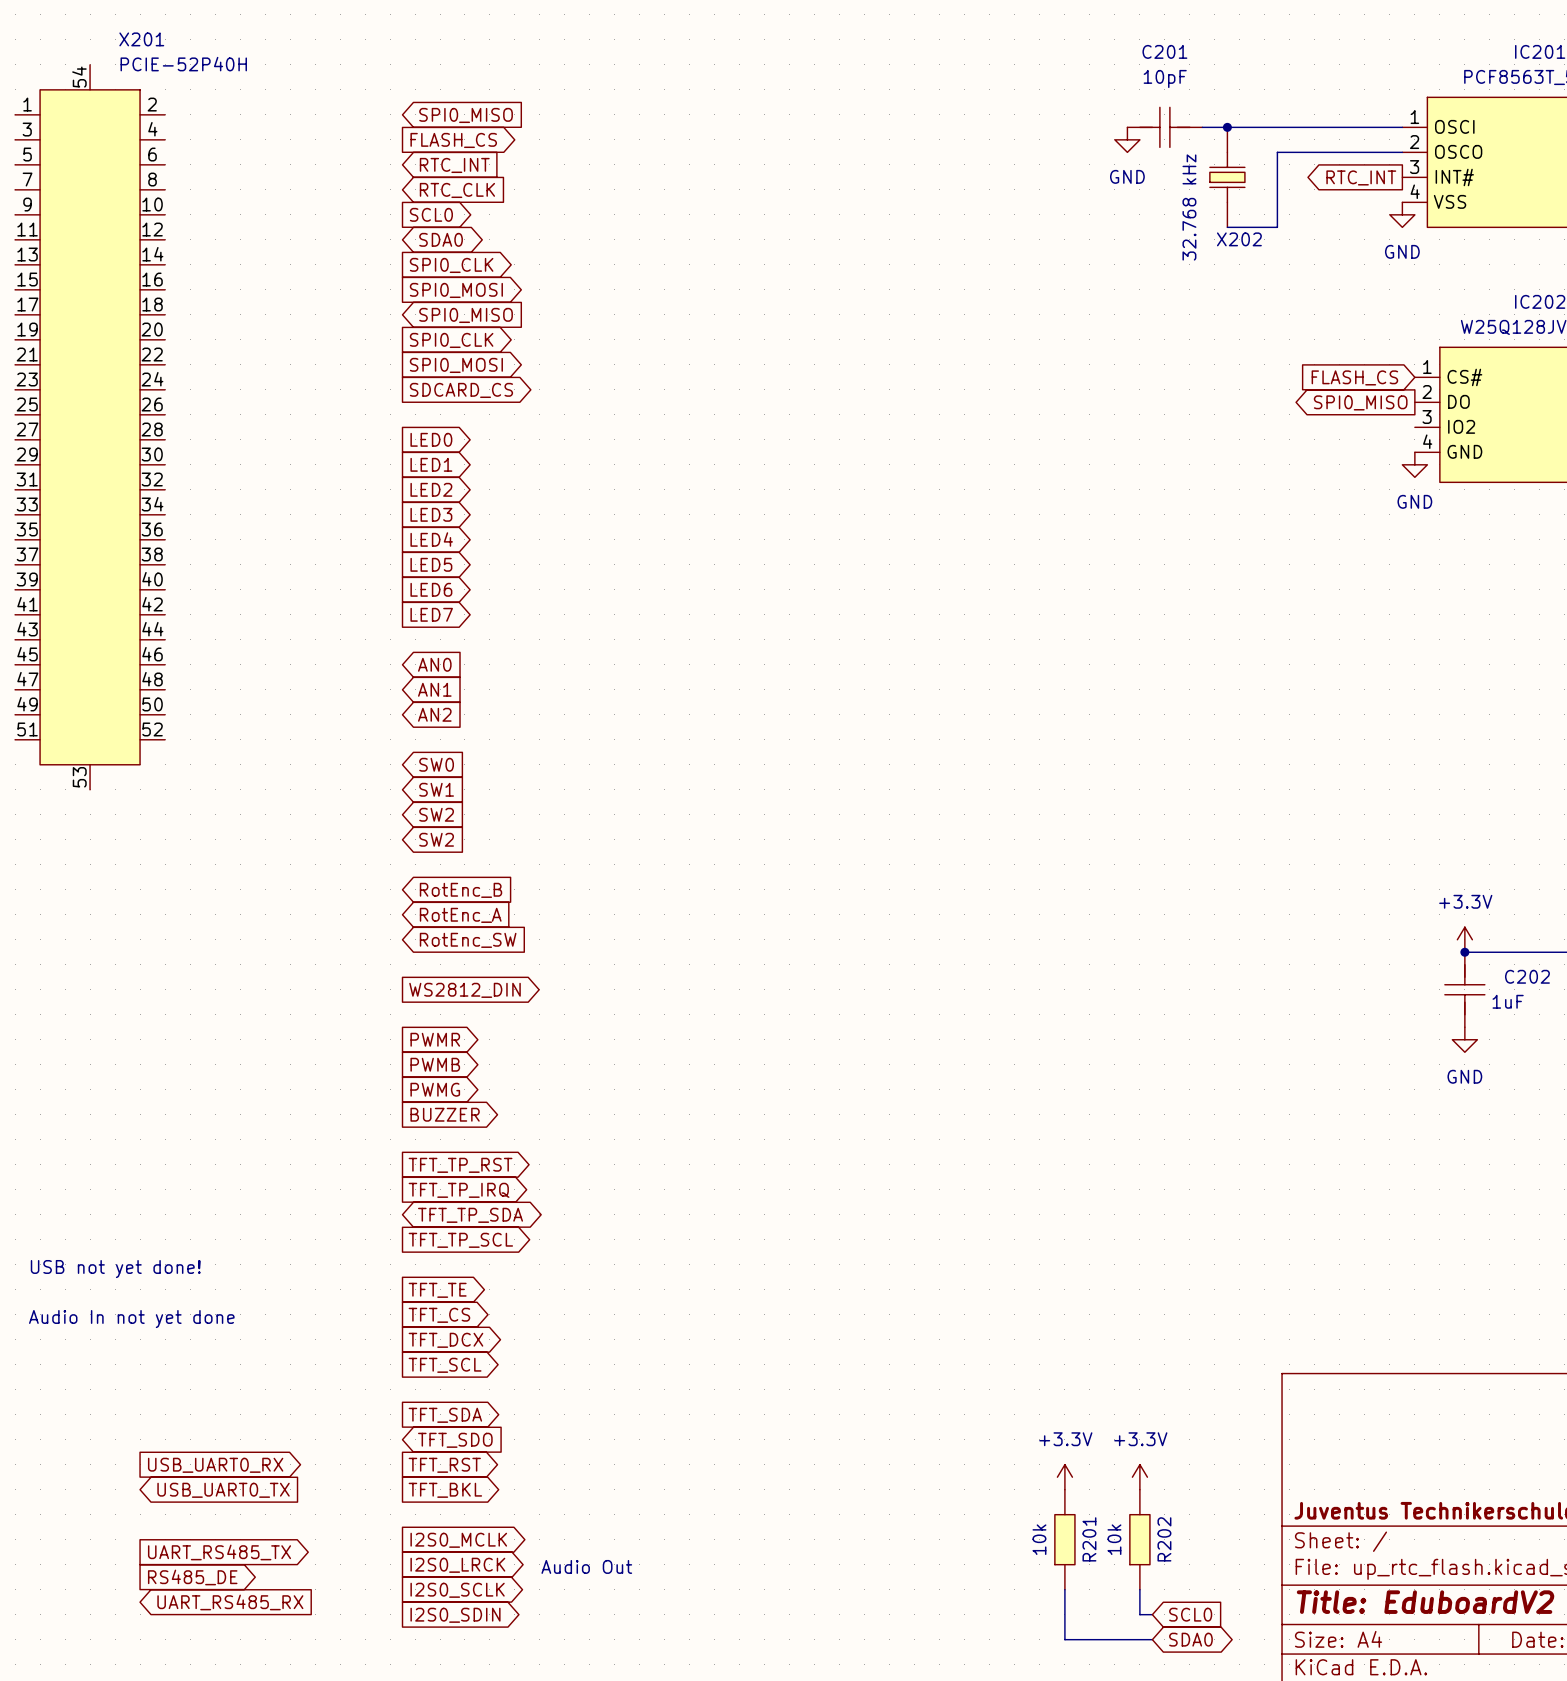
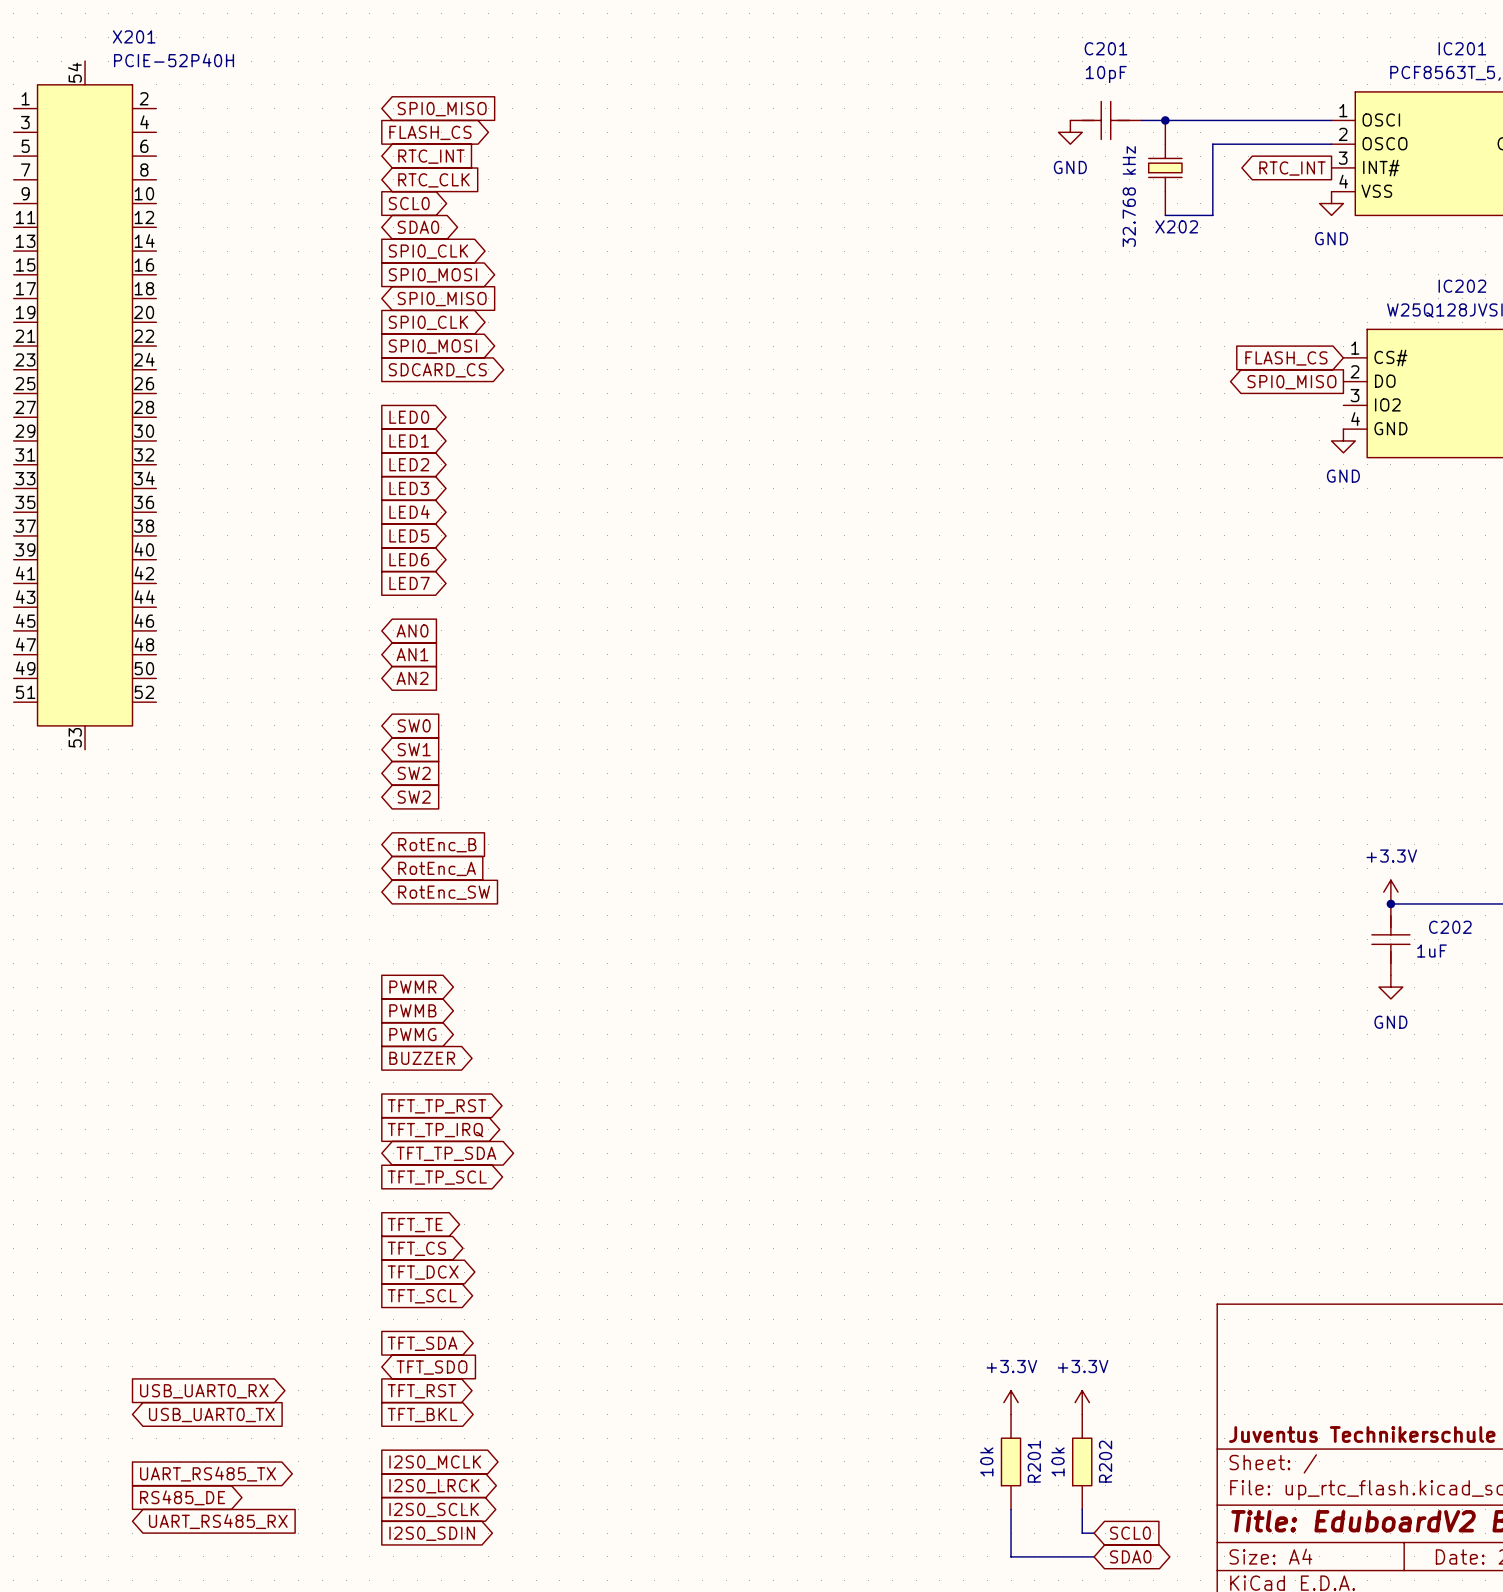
global label: WS2812_DIN (465, 990) -> none
text: USB not yet done! (115, 1269) -> none
text: Audio In not yet done (131, 1319) -> none
text: Audio Out (586, 1566) -> none

